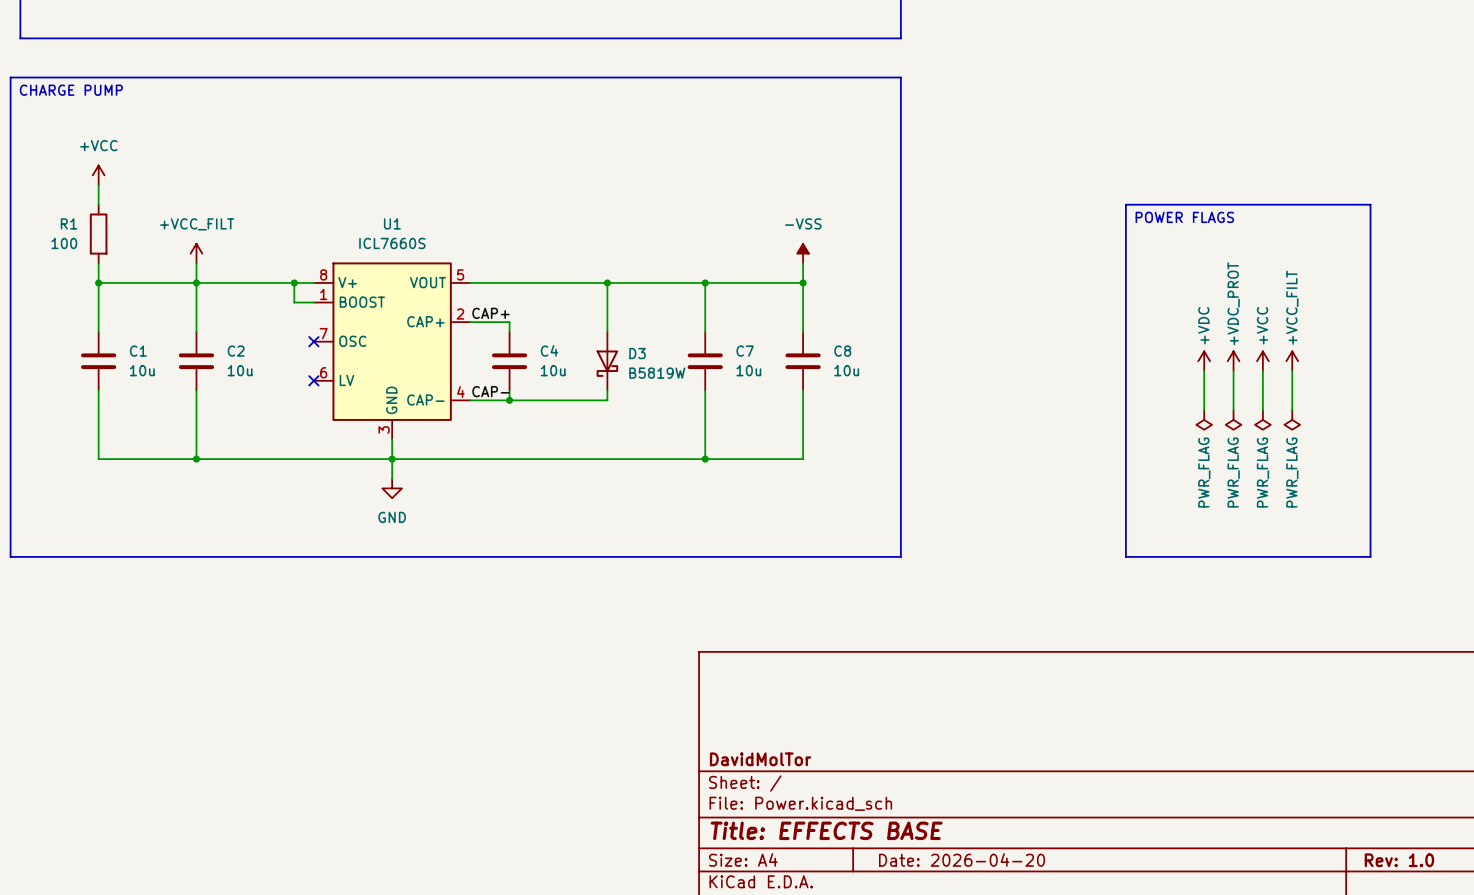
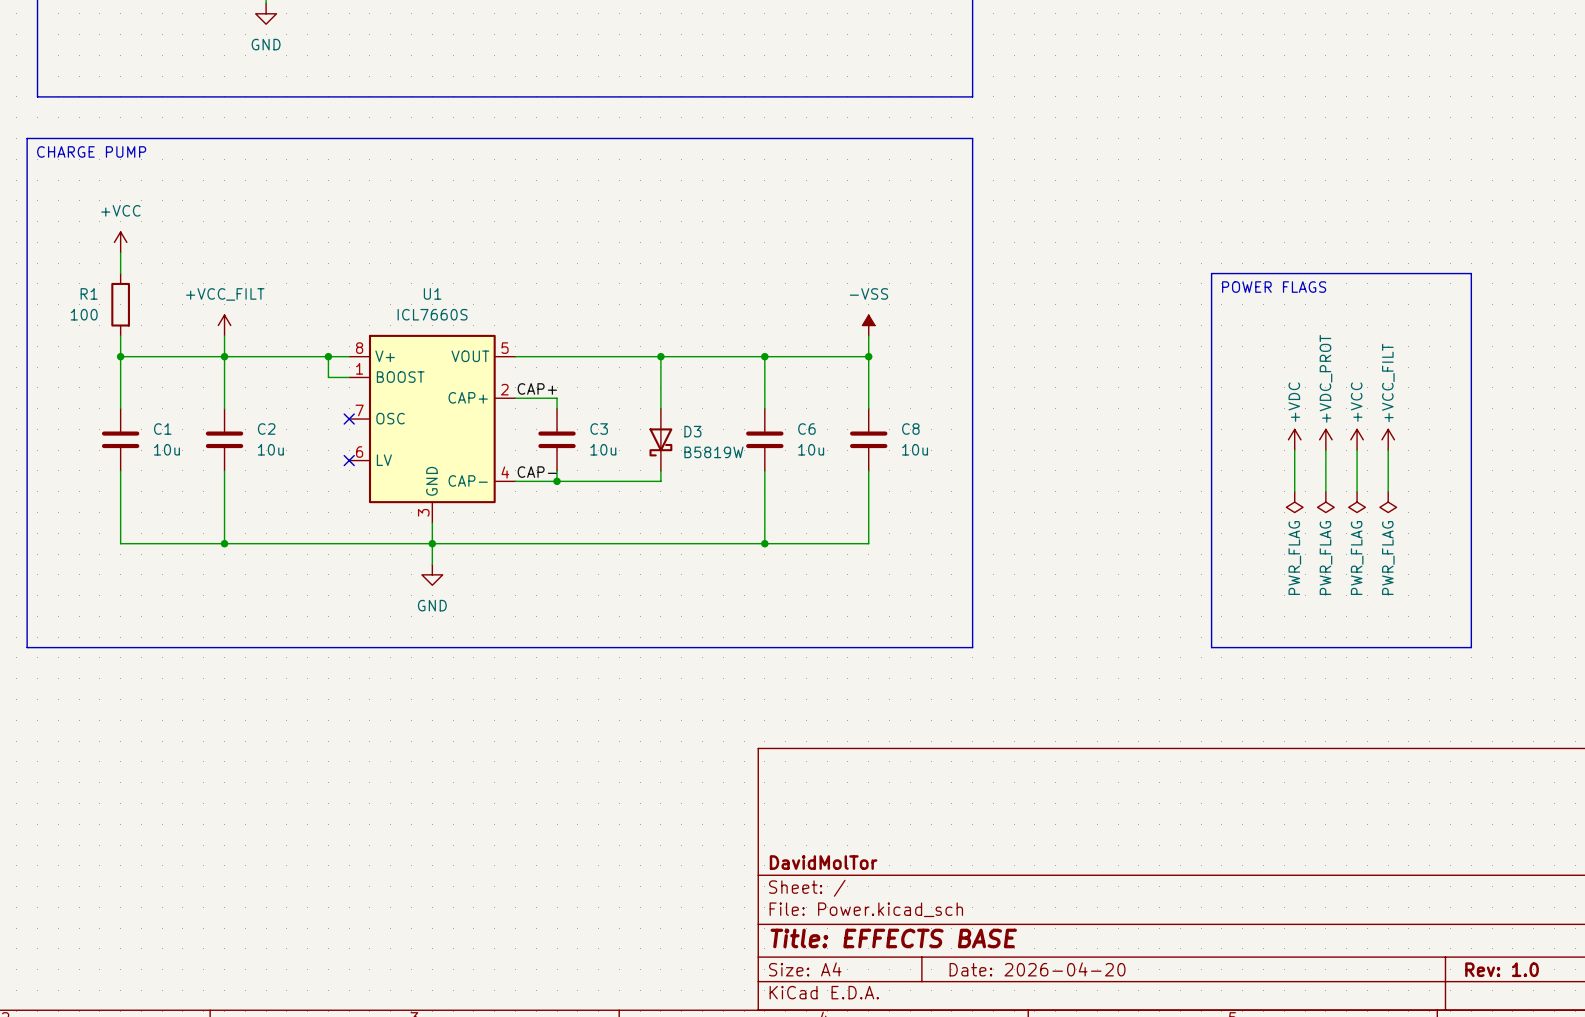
C4 name: C4 (549, 350) -> C3 (599, 429)
C7 name: C7 (745, 351) -> C6 (806, 429)

